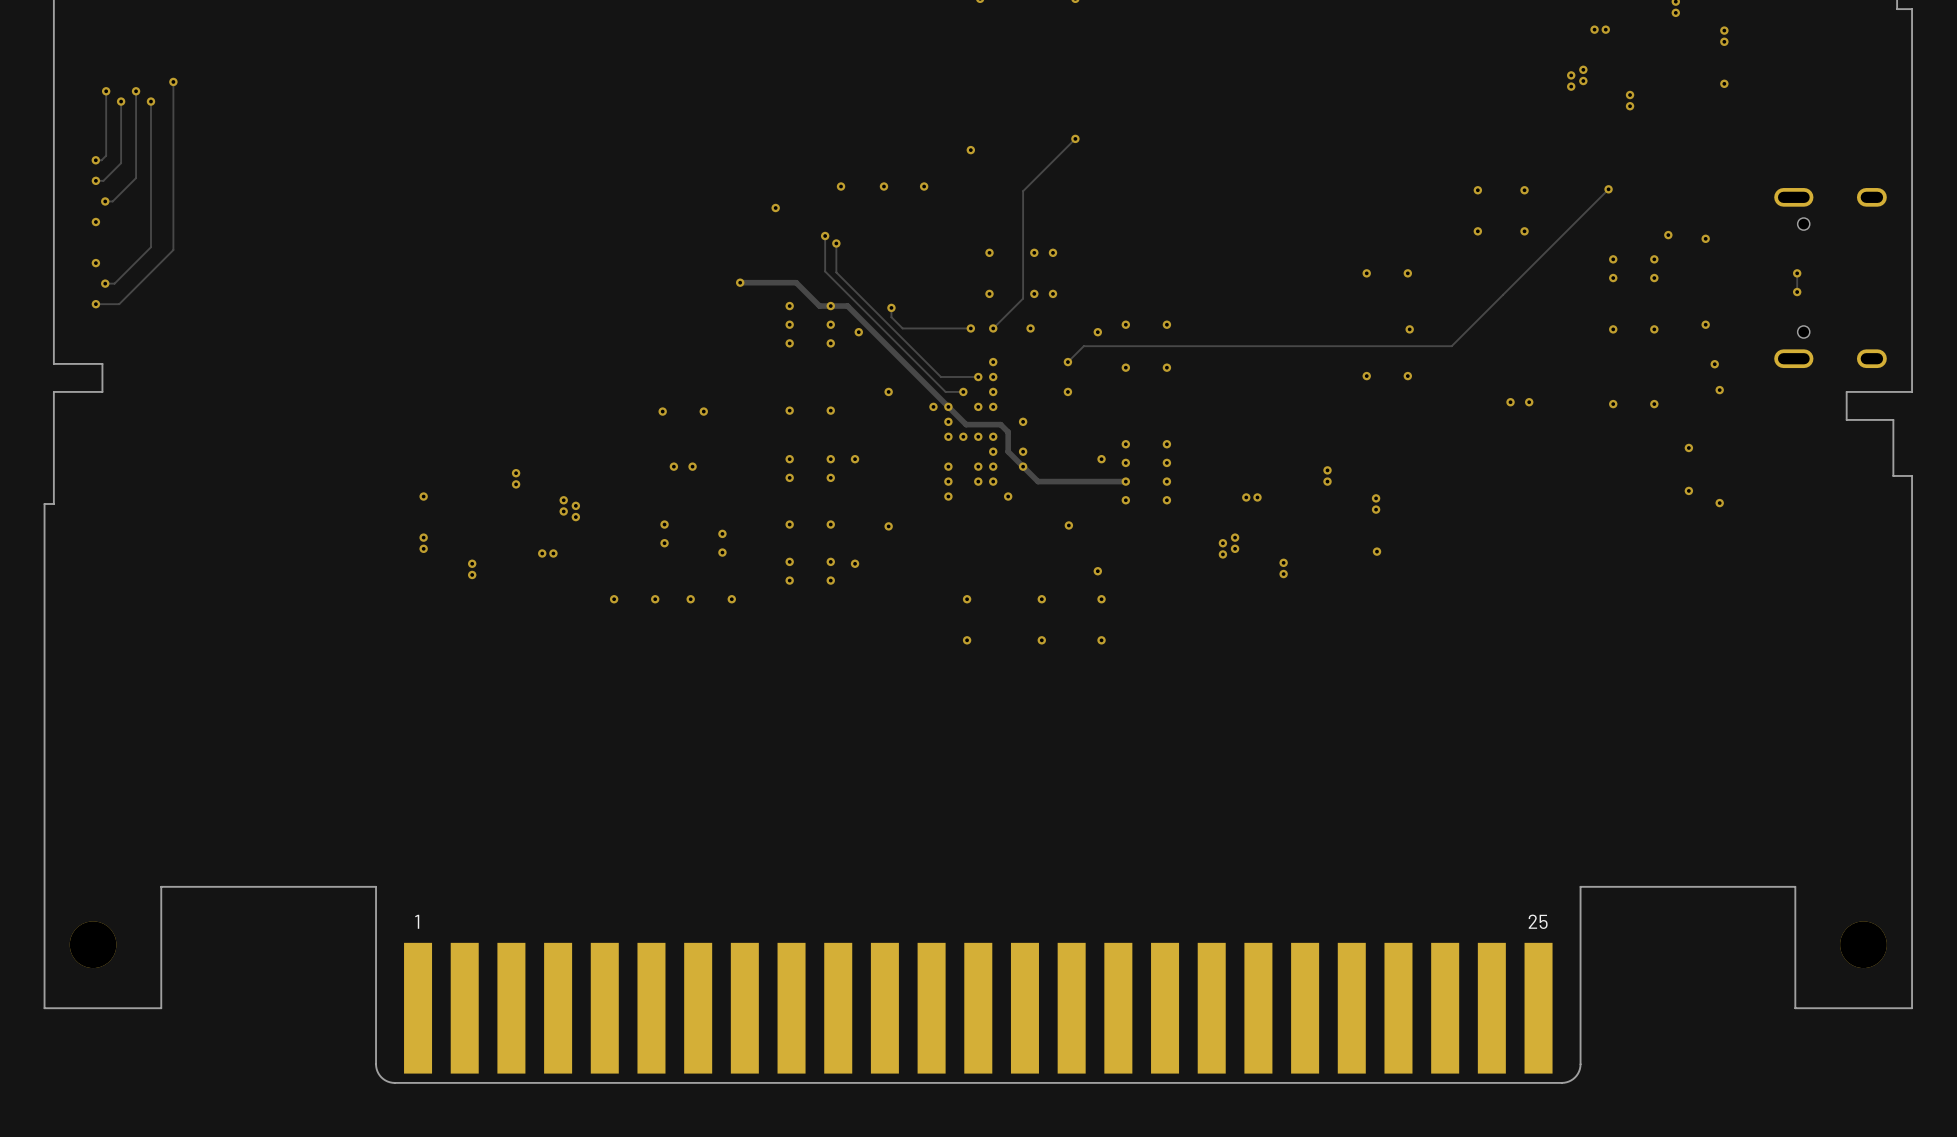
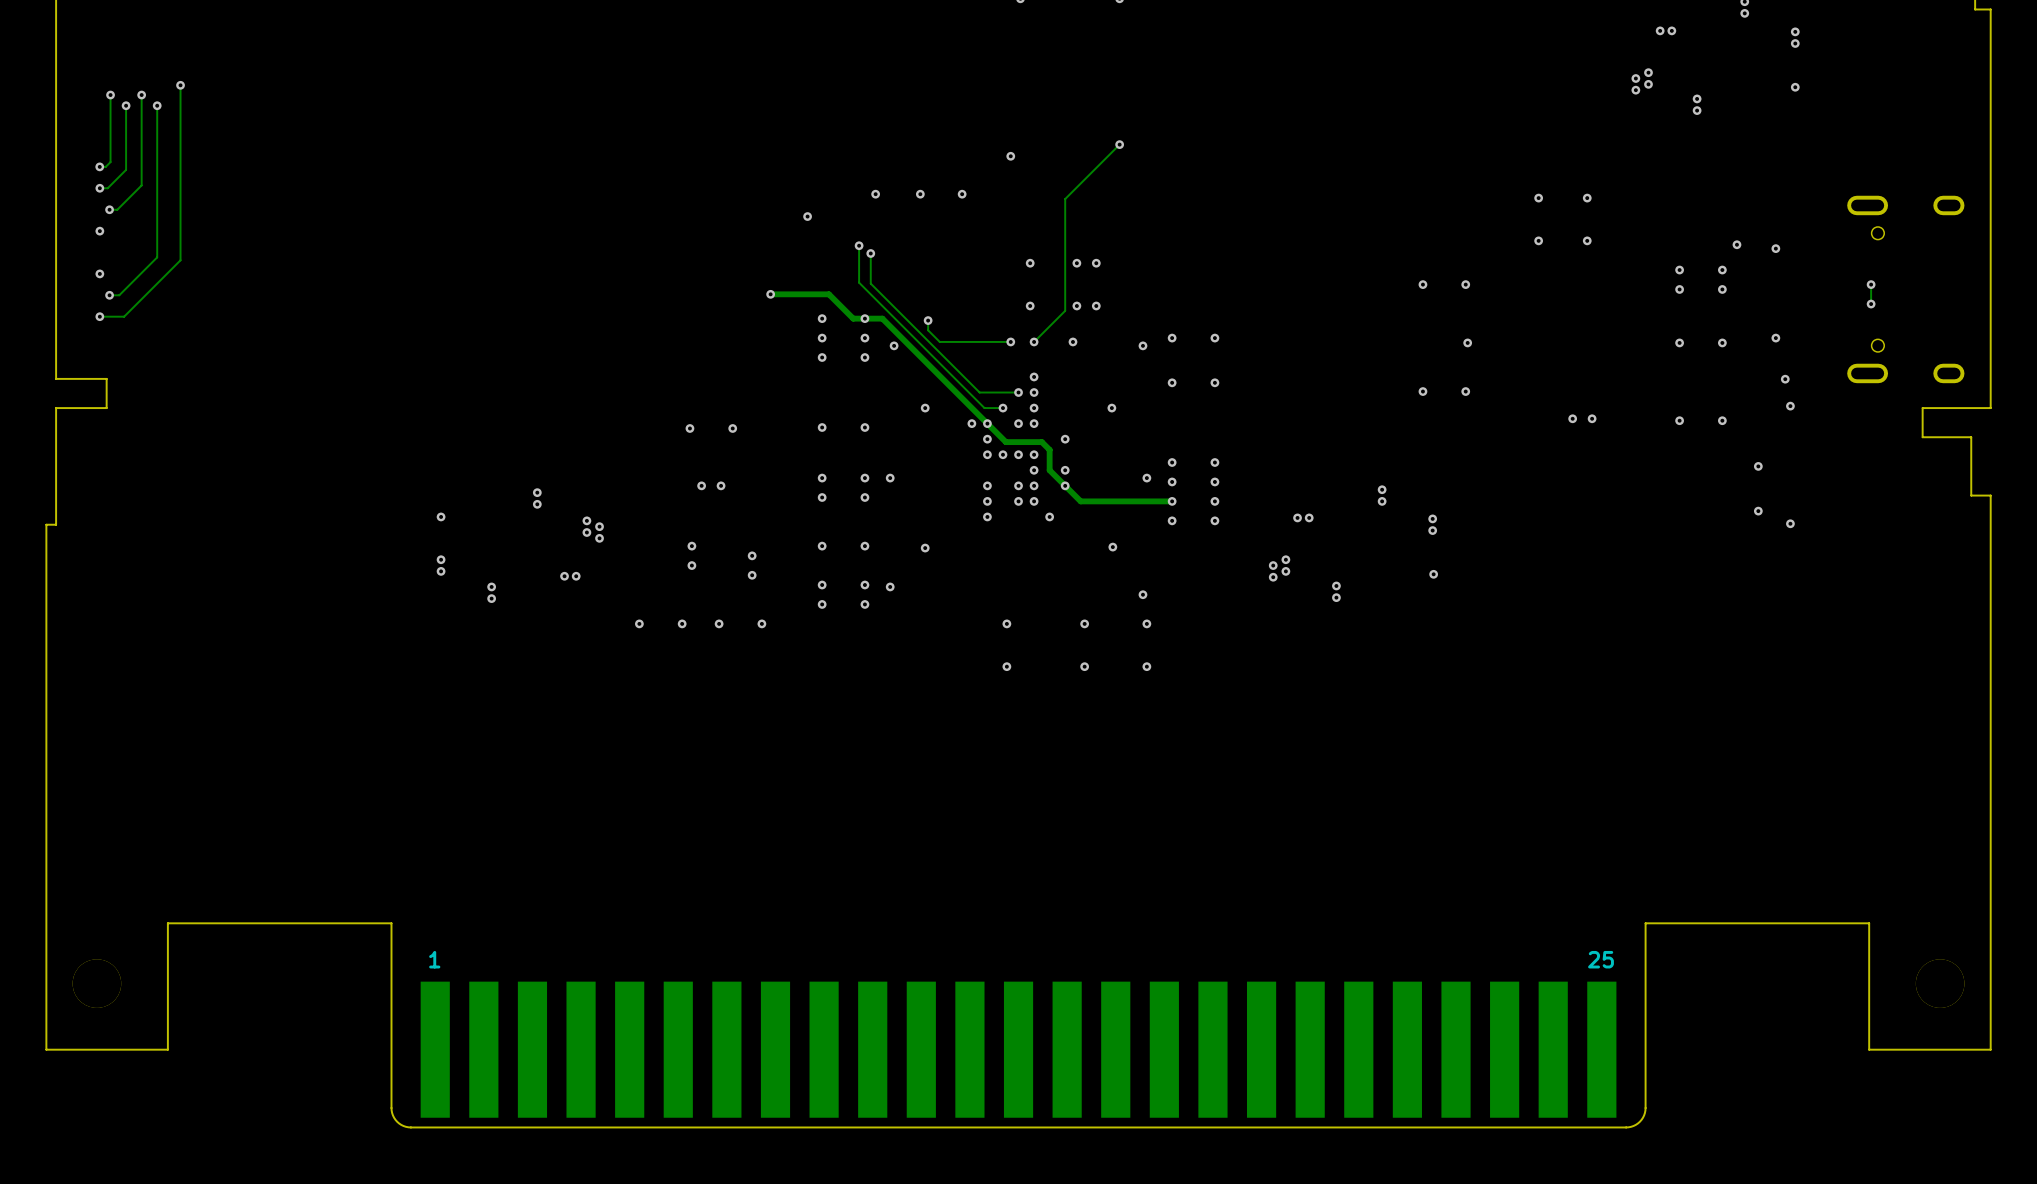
track: (1608, 189) (1451, 346) (1083, 346) (1067, 362) -> none
via: (1608, 189) -> none
via: (1067, 362) -> none

